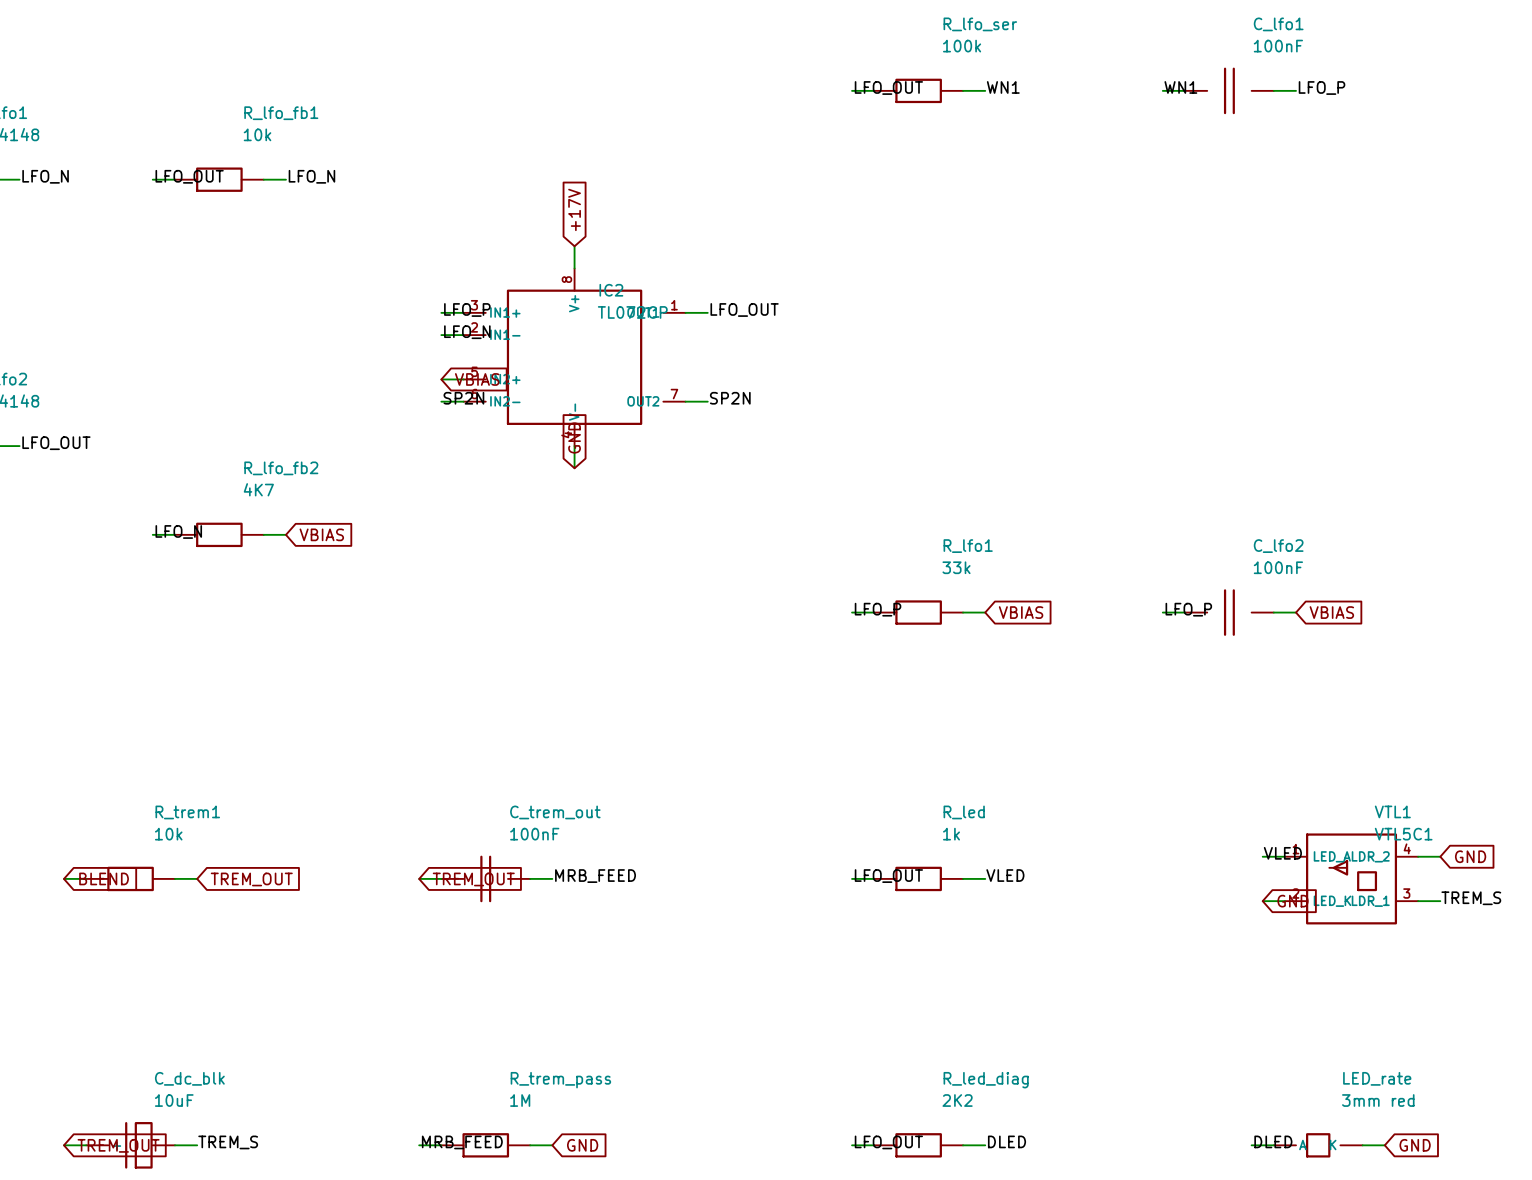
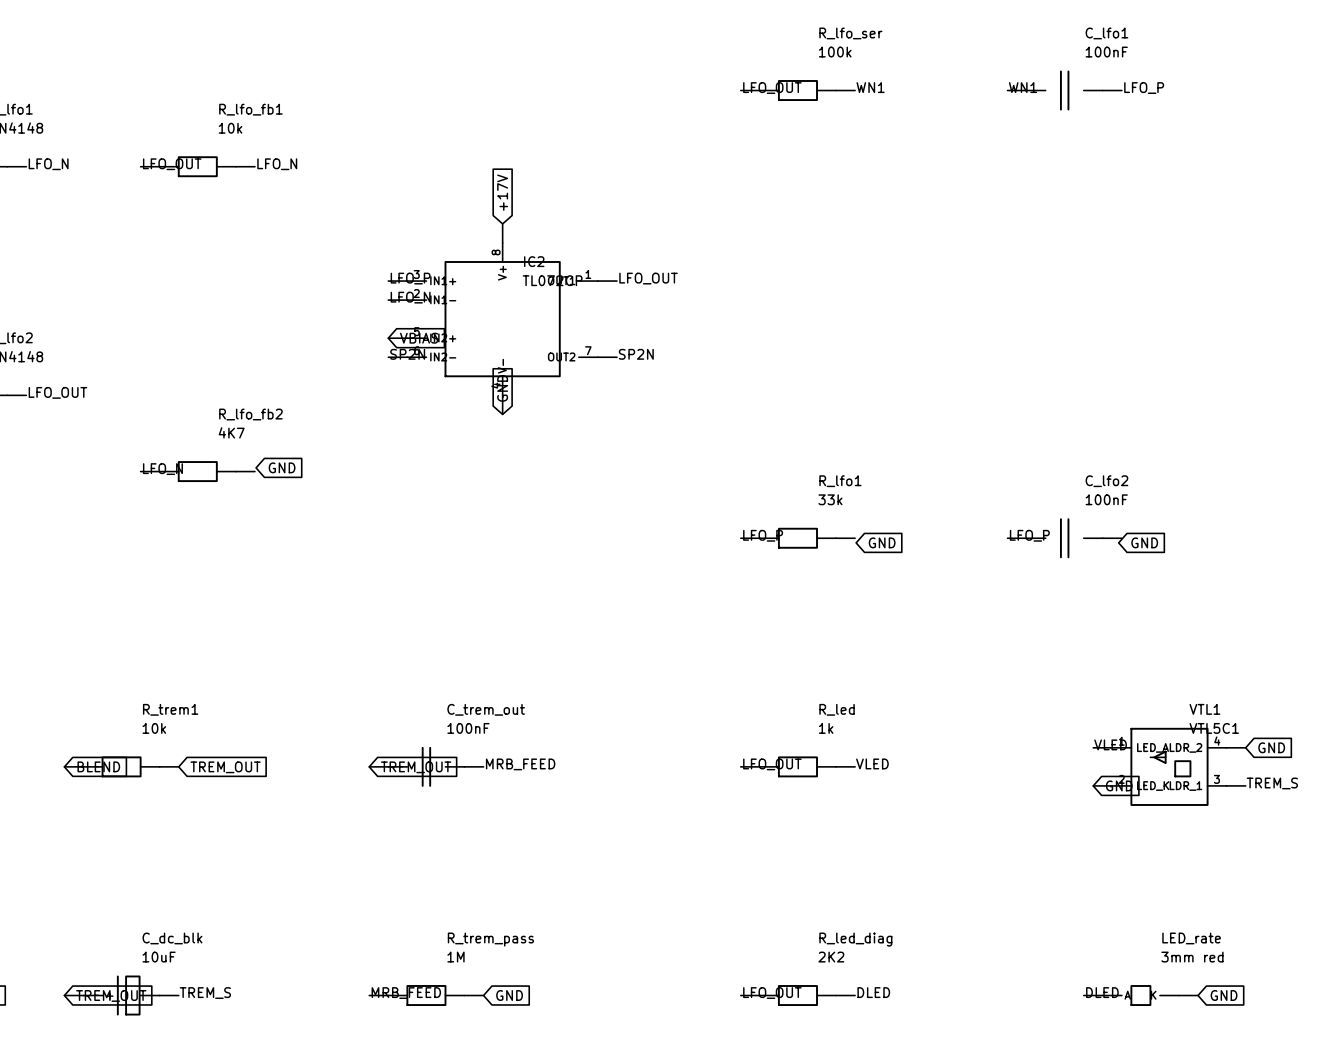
global label: VBIAS (321, 534) -> GND (282, 467)
global label: VBIAS (1021, 612) -> GND (882, 542)
global label: VBIAS (1331, 612) -> GND (1144, 542)

